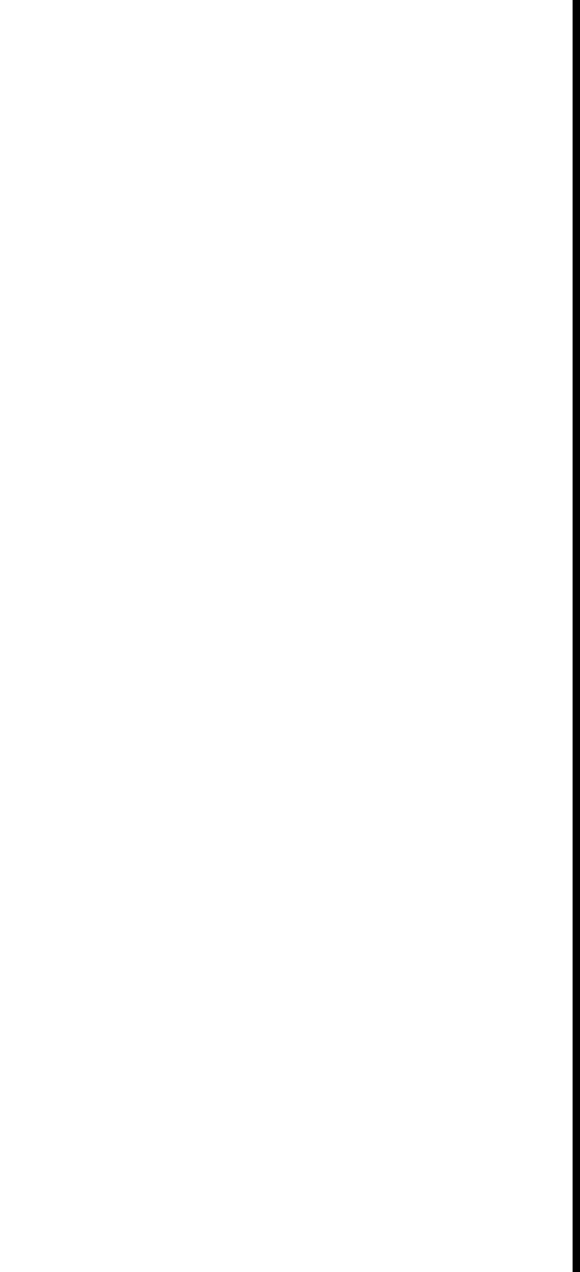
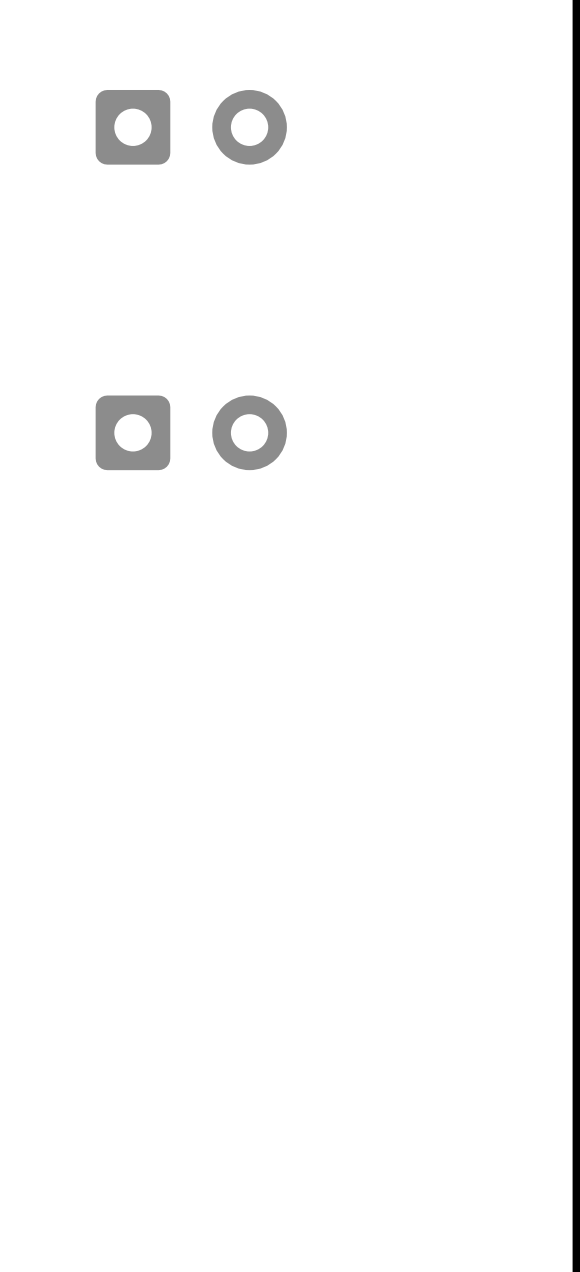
part: none -> (191, 127)
part: none -> (191, 432)

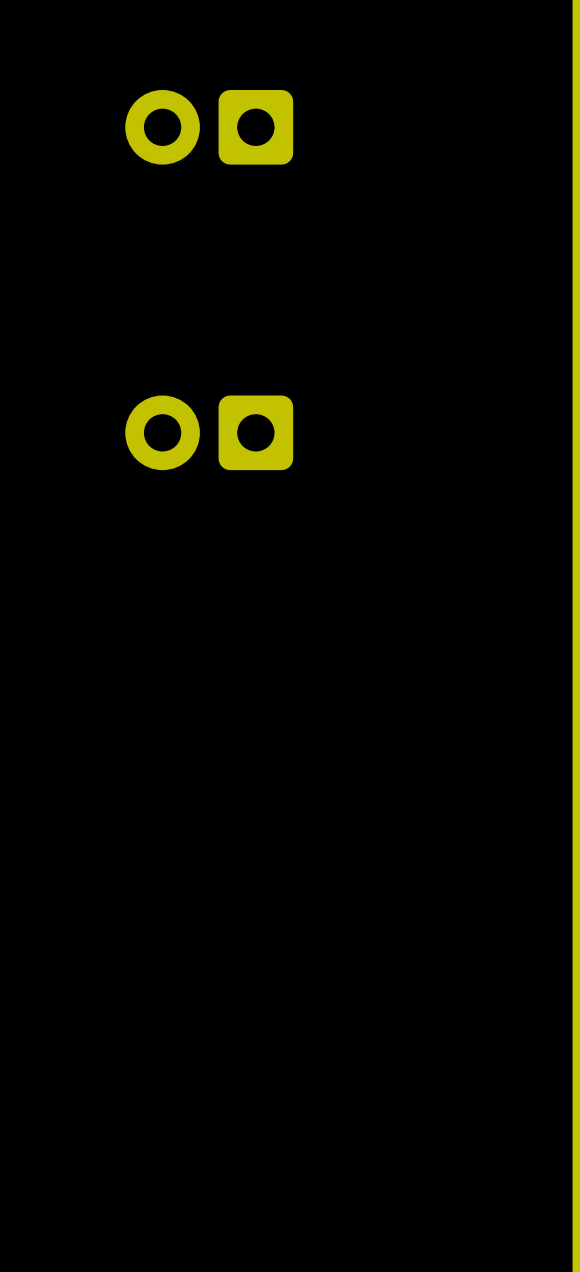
part footprint: [95, 89, 287, 165] -> [125, 89, 294, 165]
part footprint: [95, 395, 287, 471] -> [125, 395, 294, 471]

